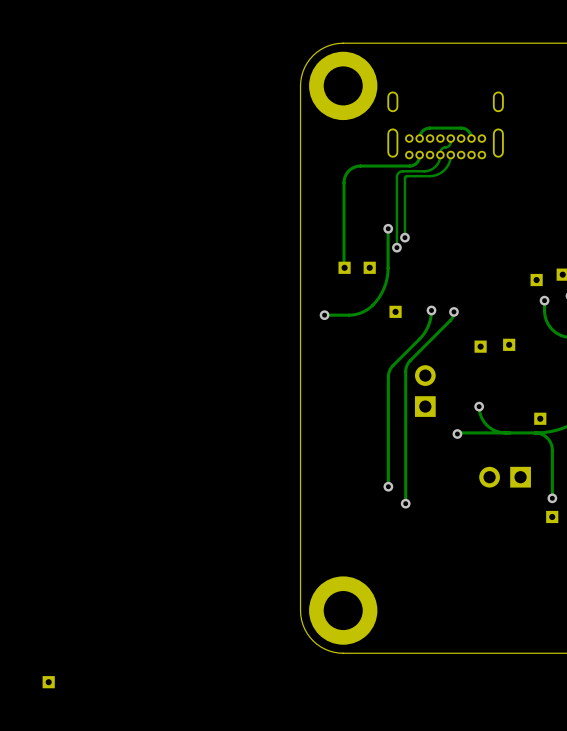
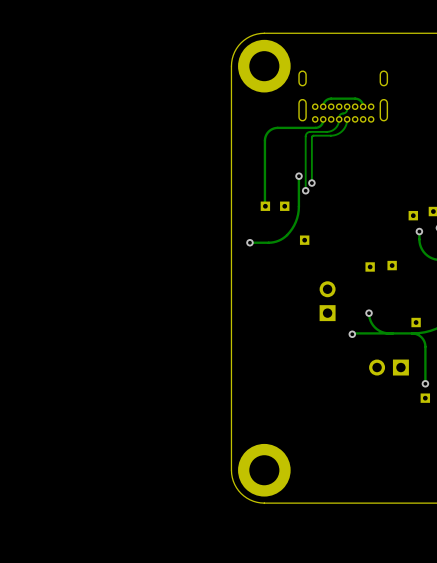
track: (431, 310) (429, 322) (424, 332) (391, 366) (388, 373) (388, 486) -> none
via: (431, 310) -> none
track: (453, 311) (451, 319) (410, 360) (406, 367) (405, 503) -> none
via: (453, 311) -> none
via: (388, 486) -> none
via: (405, 503) -> none
part: (48, 682) -> none

